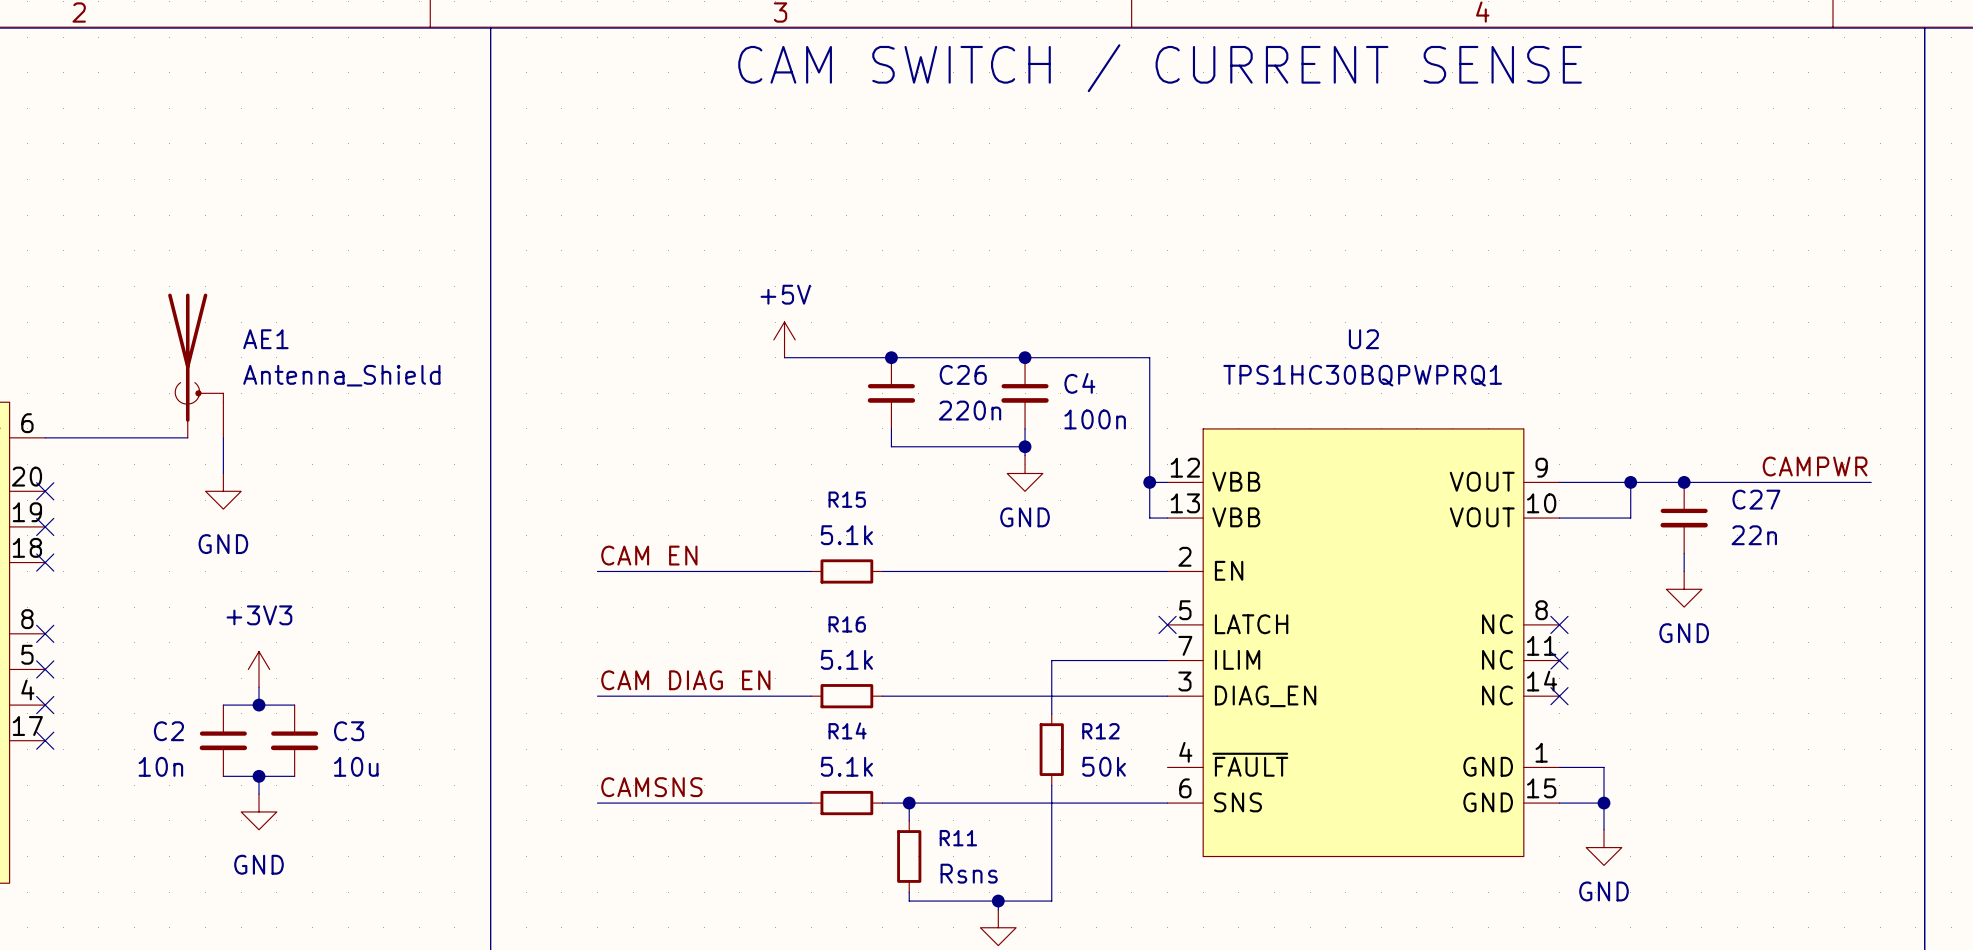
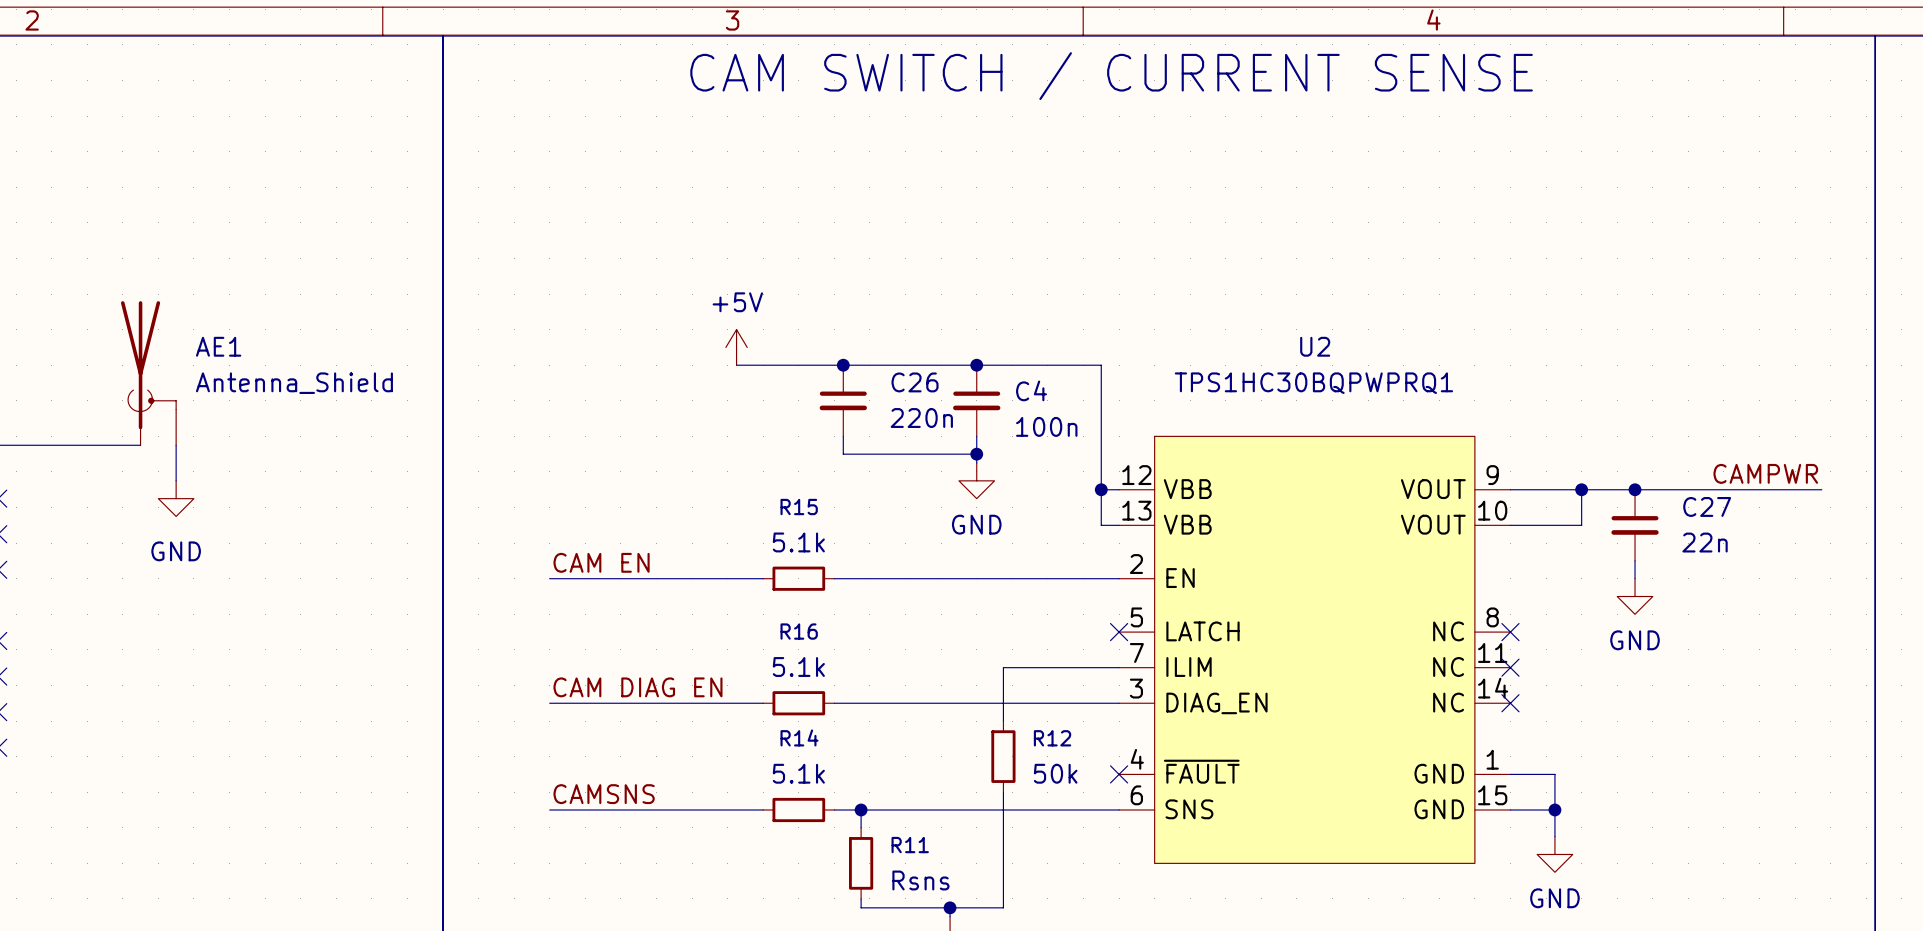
power symbol: +3V3 (259, 669) -> none
wire: (259, 687) (259, 705) -> none
wire: (223, 705) (294, 705) -> none
junction: (259, 705) -> none
C2: 10n (223, 740) -> none
C3: 10u (294, 740) -> none
no-connect mark: none -> (1119, 774)
wire: (223, 776) (294, 776) -> none
wire: (259, 776) (259, 794) -> none
junction: (259, 776) -> none
power symbol: GND (259, 811) -> none

